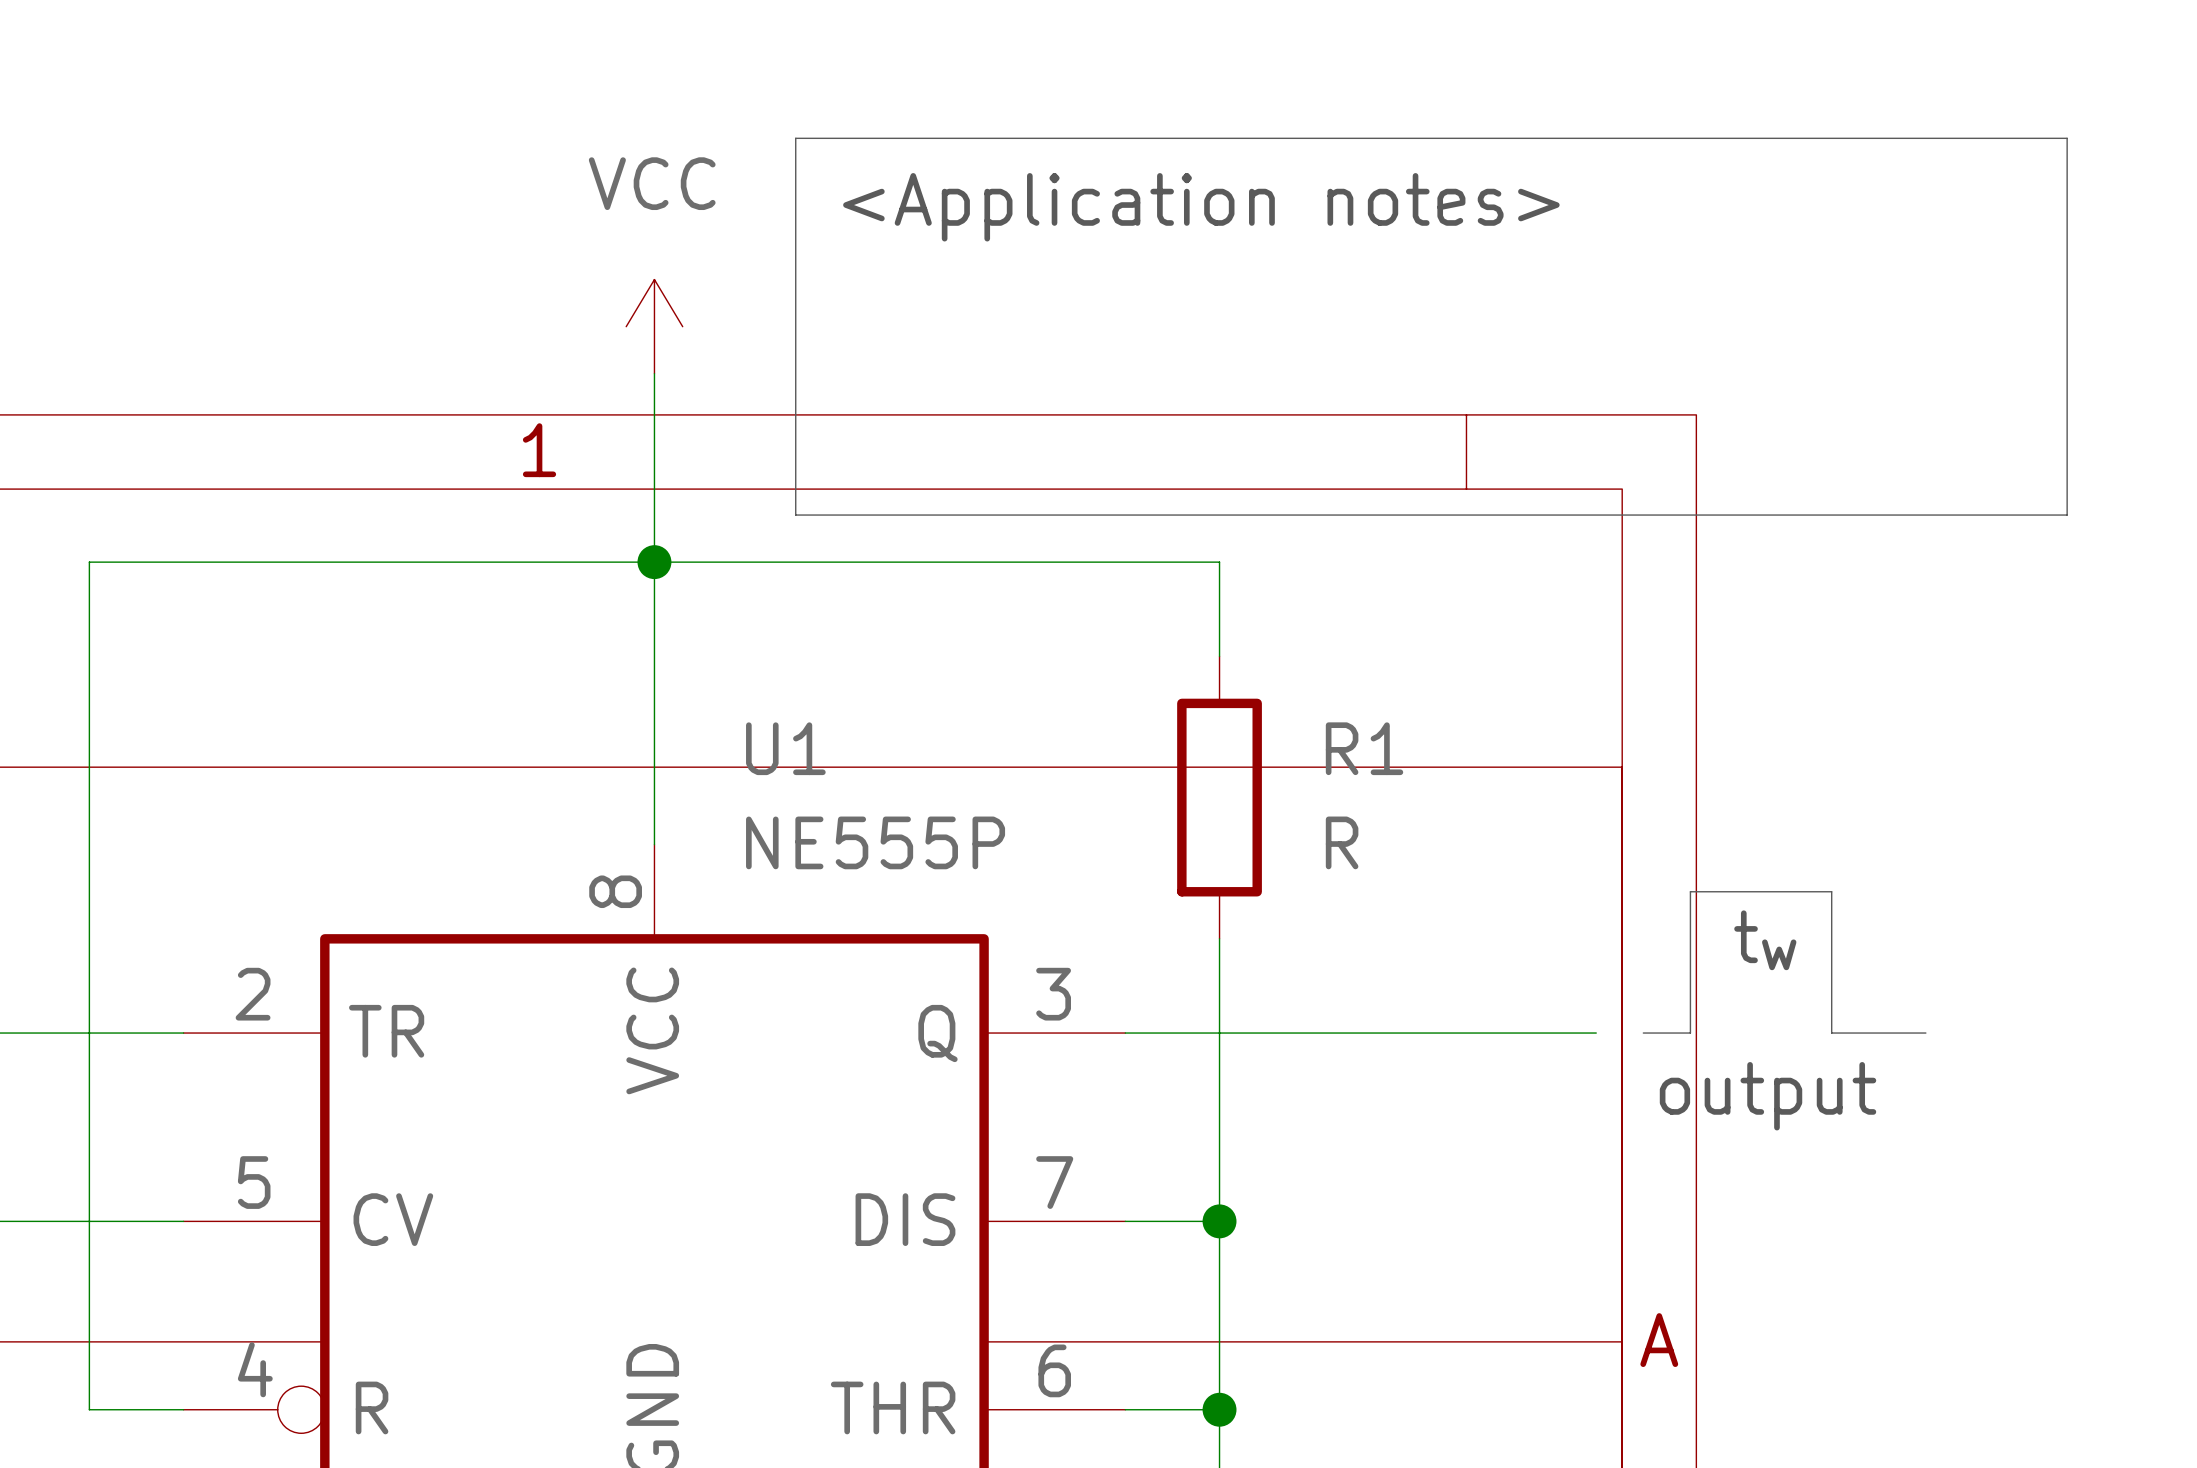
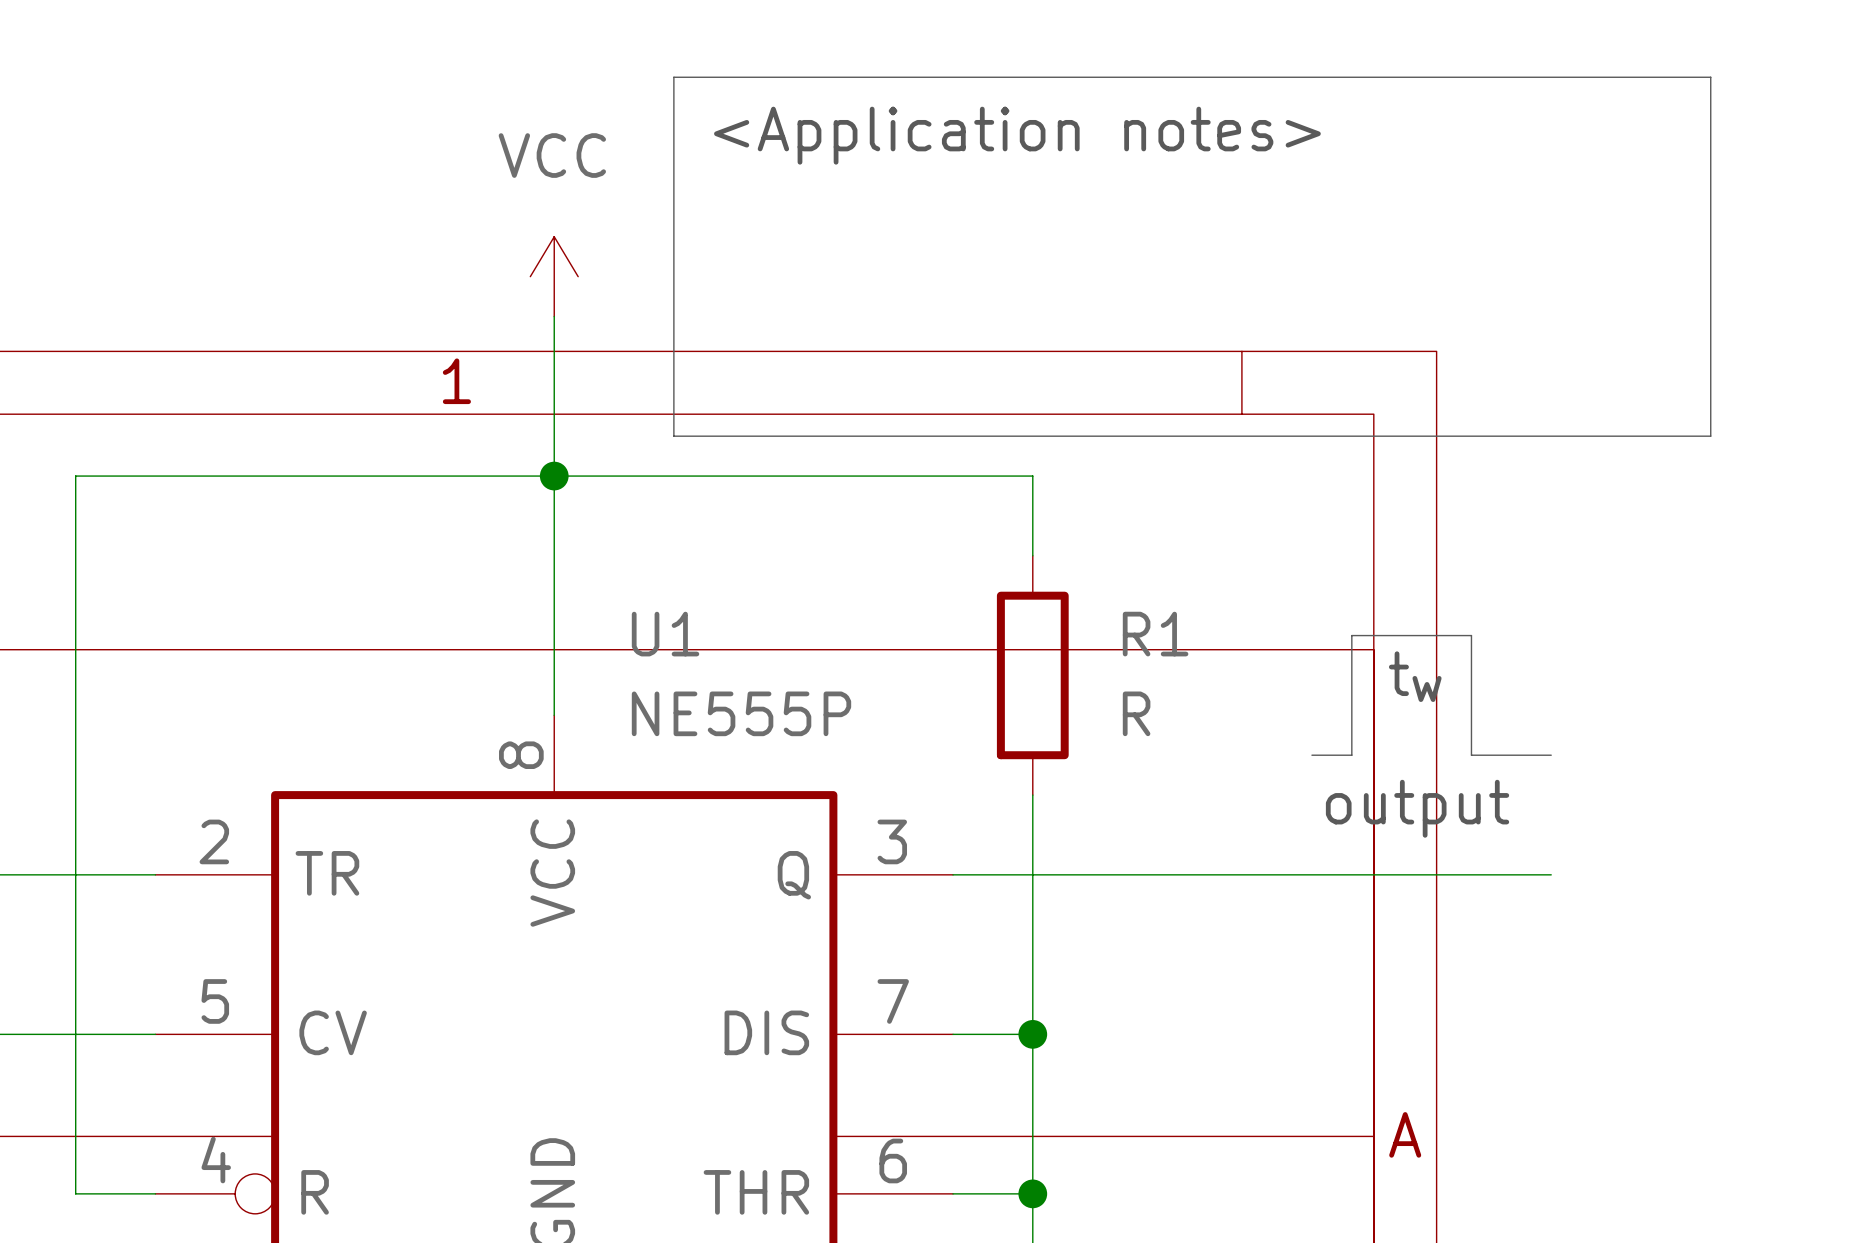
line: (795, 138) (2067, 138) (2067, 515) (2020, 515) -> (673, 117) (673, 77) (1710, 77) (1710, 436)
text position: <Application notes> (1201, 207) -> <Application notes> (1017, 135)
line: (1737, 891) (1690, 891) (1690, 1033) (1643, 1033) -> (1471, 755) (1471, 635) (1351, 635) (1351, 755) (1311, 755)
line: (1831, 891) (1831, 1033) (1925, 1033) -> none
text position: tw (1765, 940) -> tw (1415, 676)
wire: none -> (1351, 874) (1551, 874)
text position: output (1768, 1096) -> output (1417, 808)

